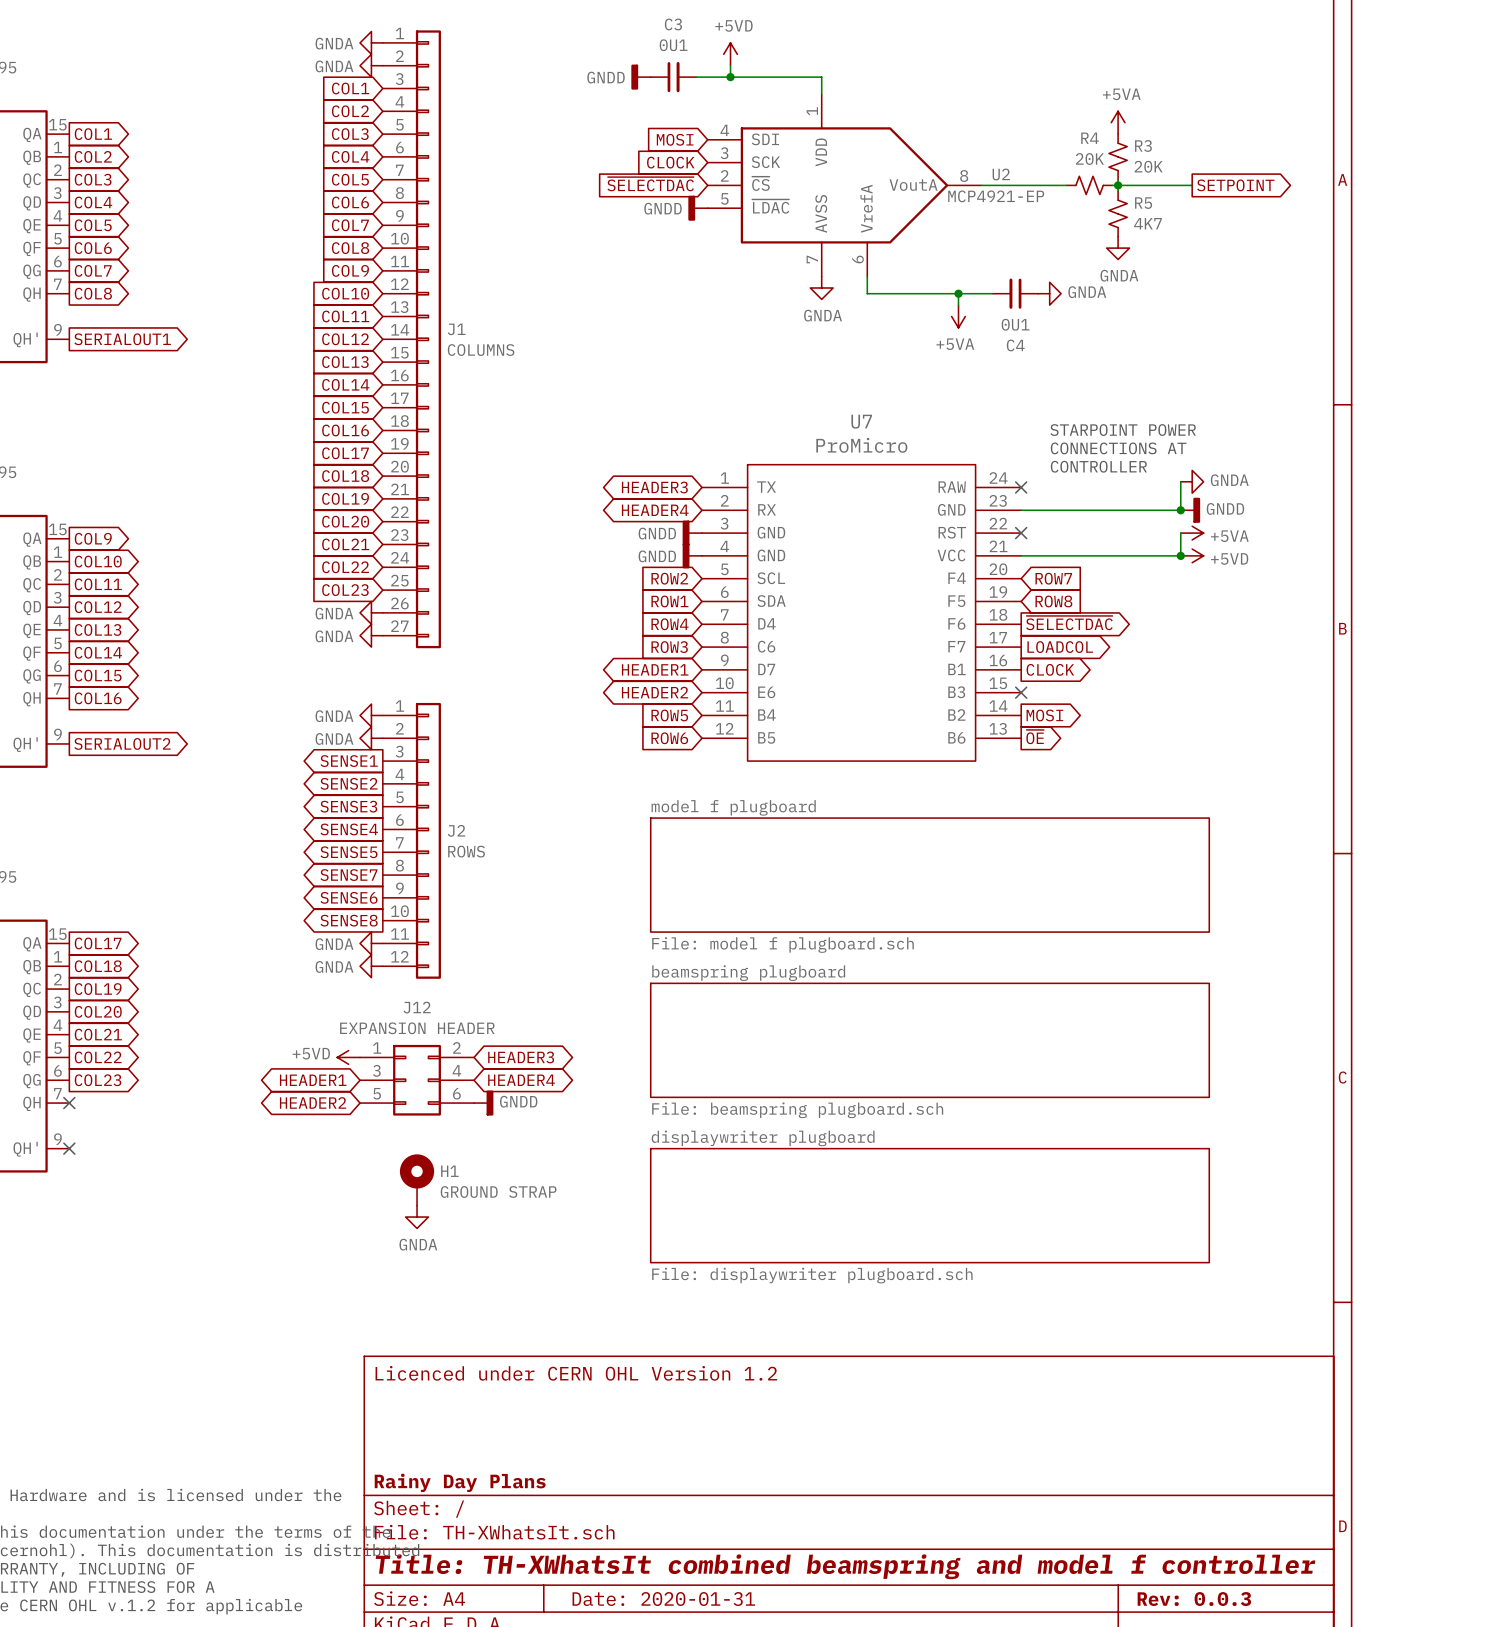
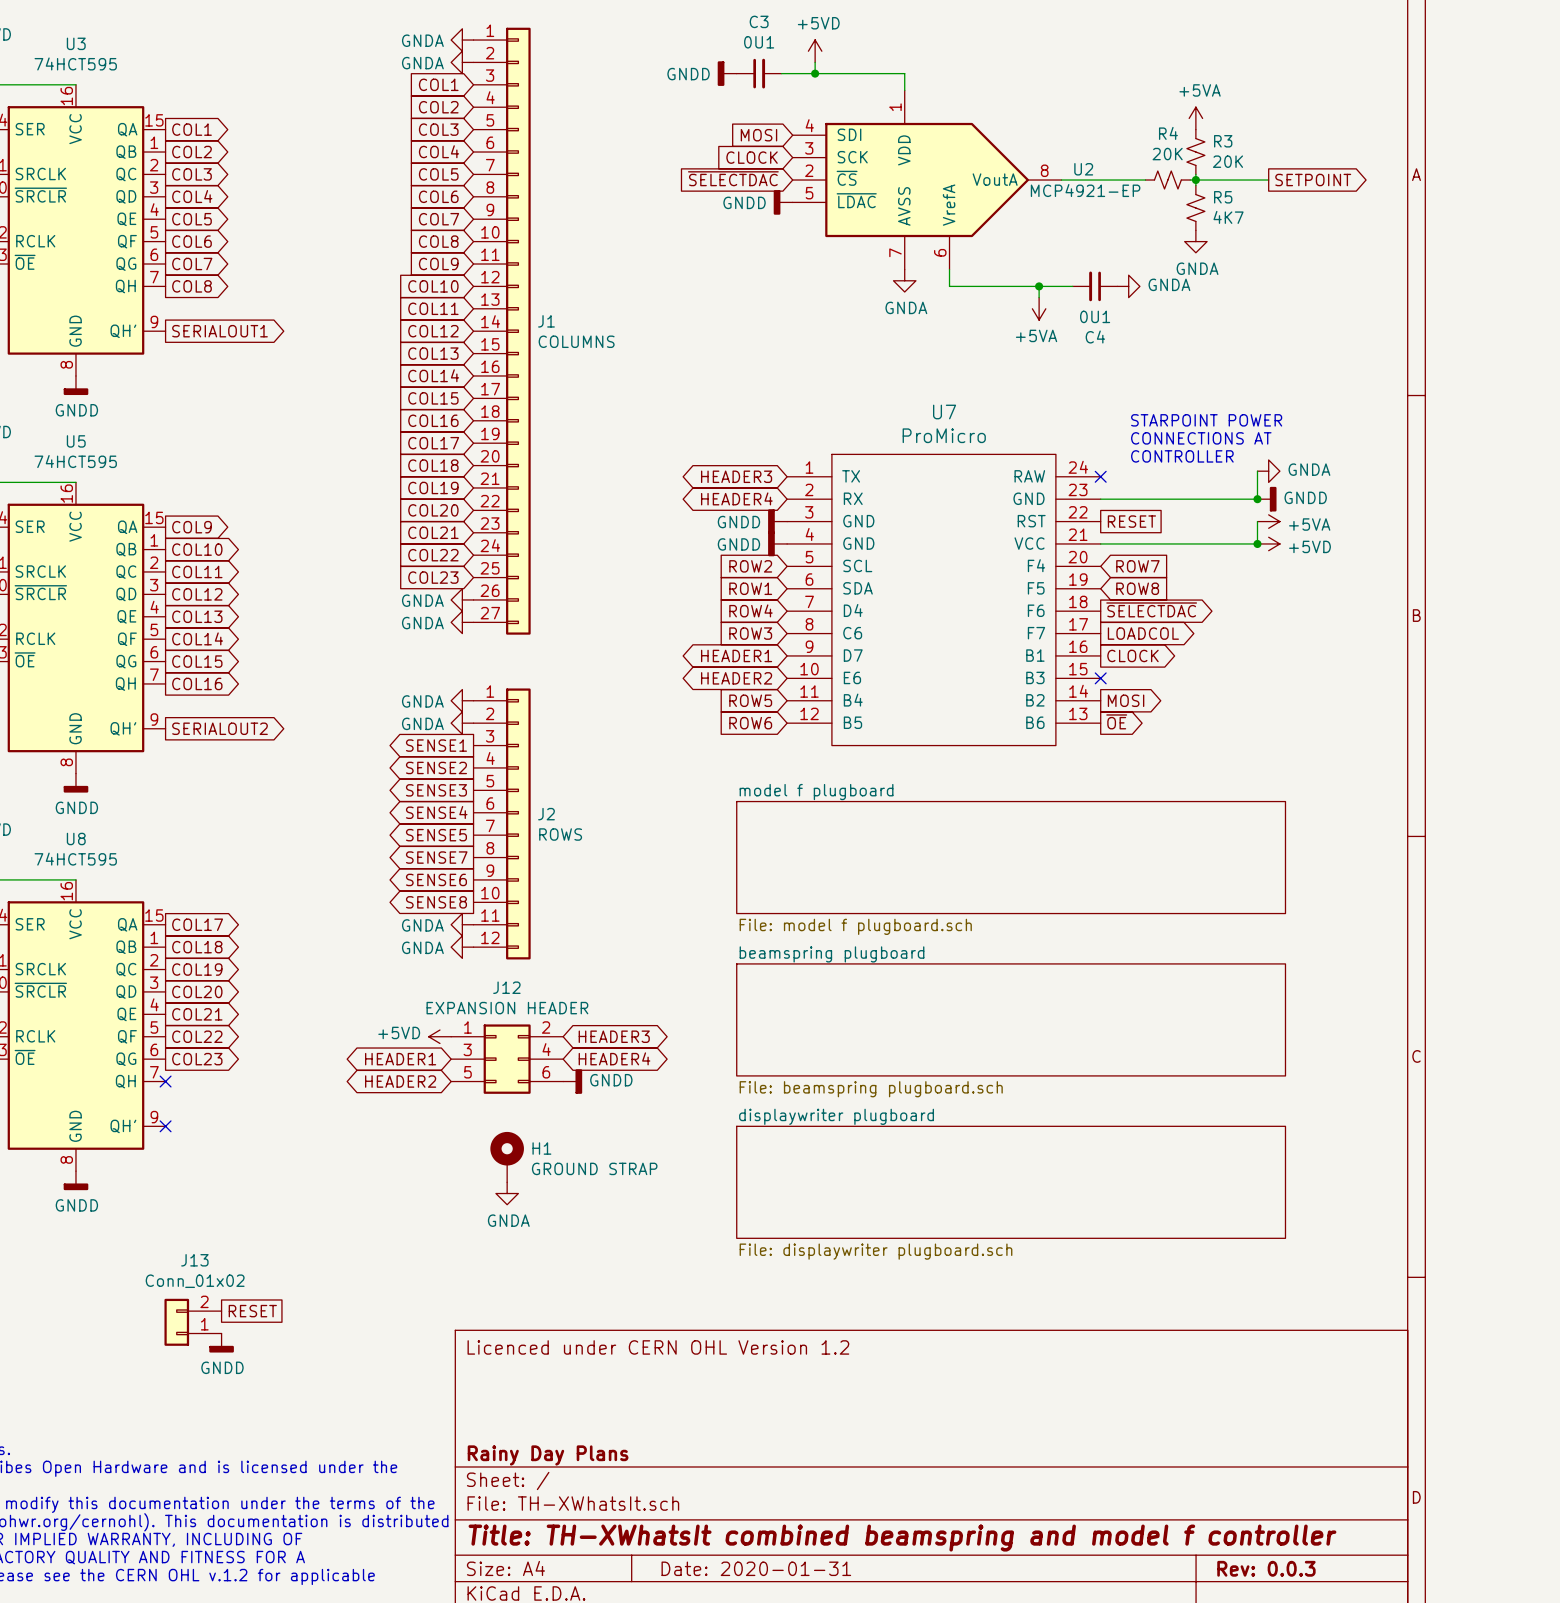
no-connect mark: (1021, 533) -> none
global label: none -> RESET (1131, 521)
global label: none -> RESET (252, 1311)
J13: none -> Conn_01x02 (193, 1322)
power symbol: none -> GNDD (221, 1343)

